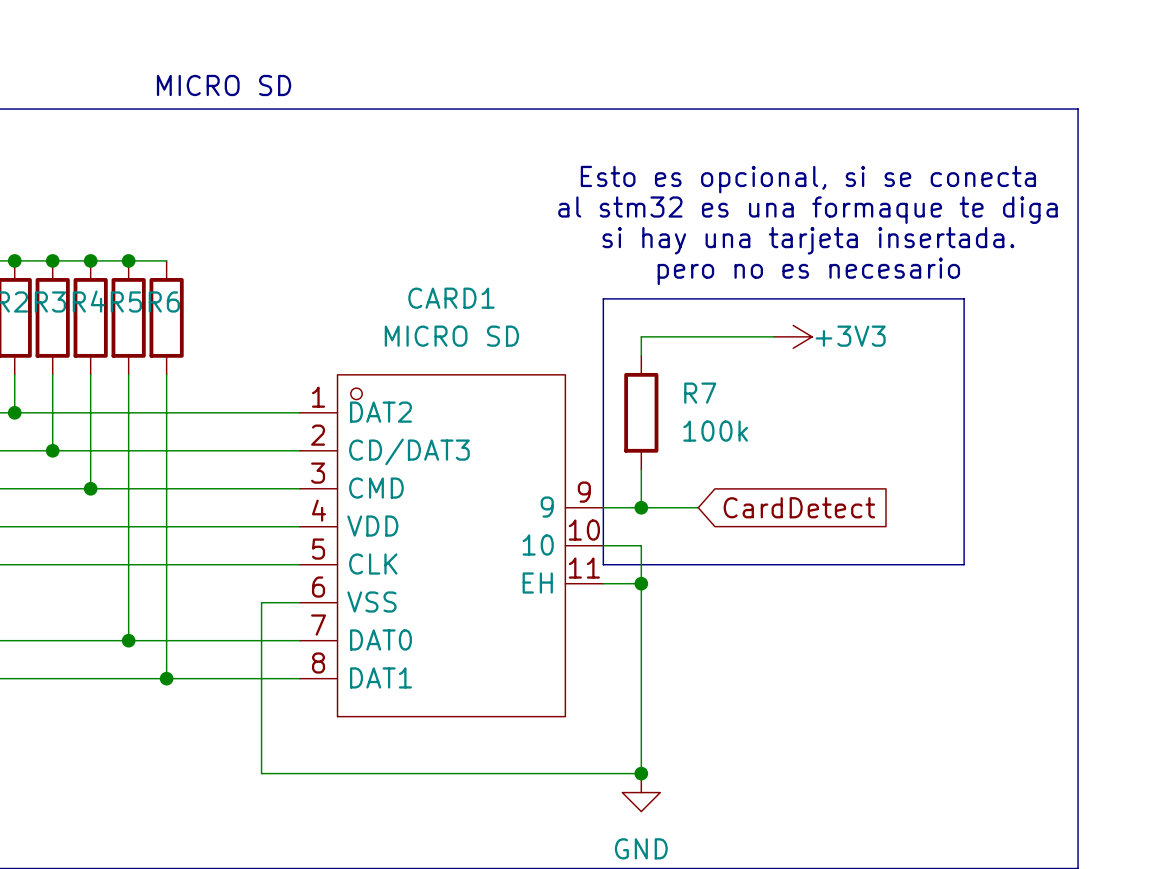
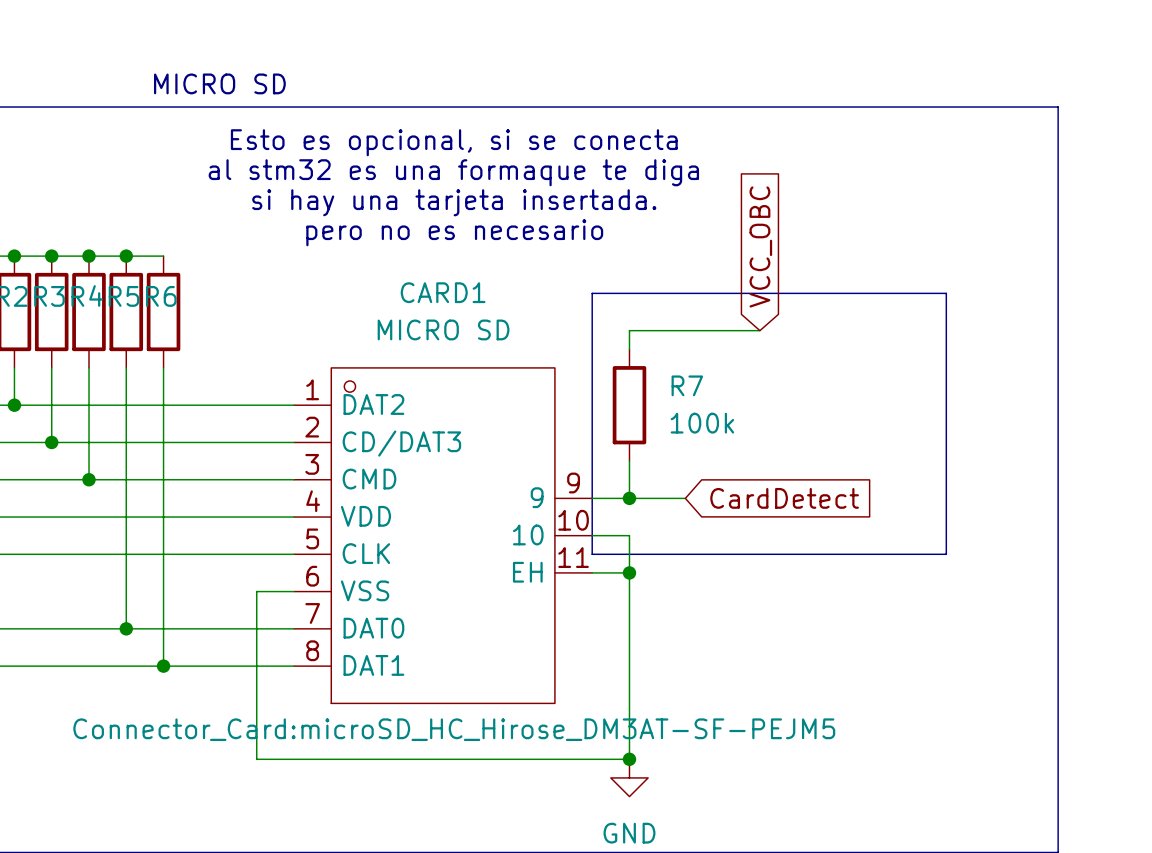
text position: Esto es opcional, si se conecta (808, 179) -> Esto es opcional, si se conecta (454, 142)
text position: al stm32 es una formaque te diga (807, 210) -> al stm32 es una formaque te diga (453, 172)
text position: si hay una tarjeta insertada. (808, 240) -> si hay una tarjeta insertada. (454, 202)
global label: none -> VCC_OBC (760, 246)
text position: pero no es necesario (808, 271) -> pero no es necesario (454, 232)
power symbol: +3V3 (793, 336) -> none
CARD1 text: none -> Connector_Card:microSD_HC_Hirose_DM3AT-SF-PEJM5 (454, 729)

